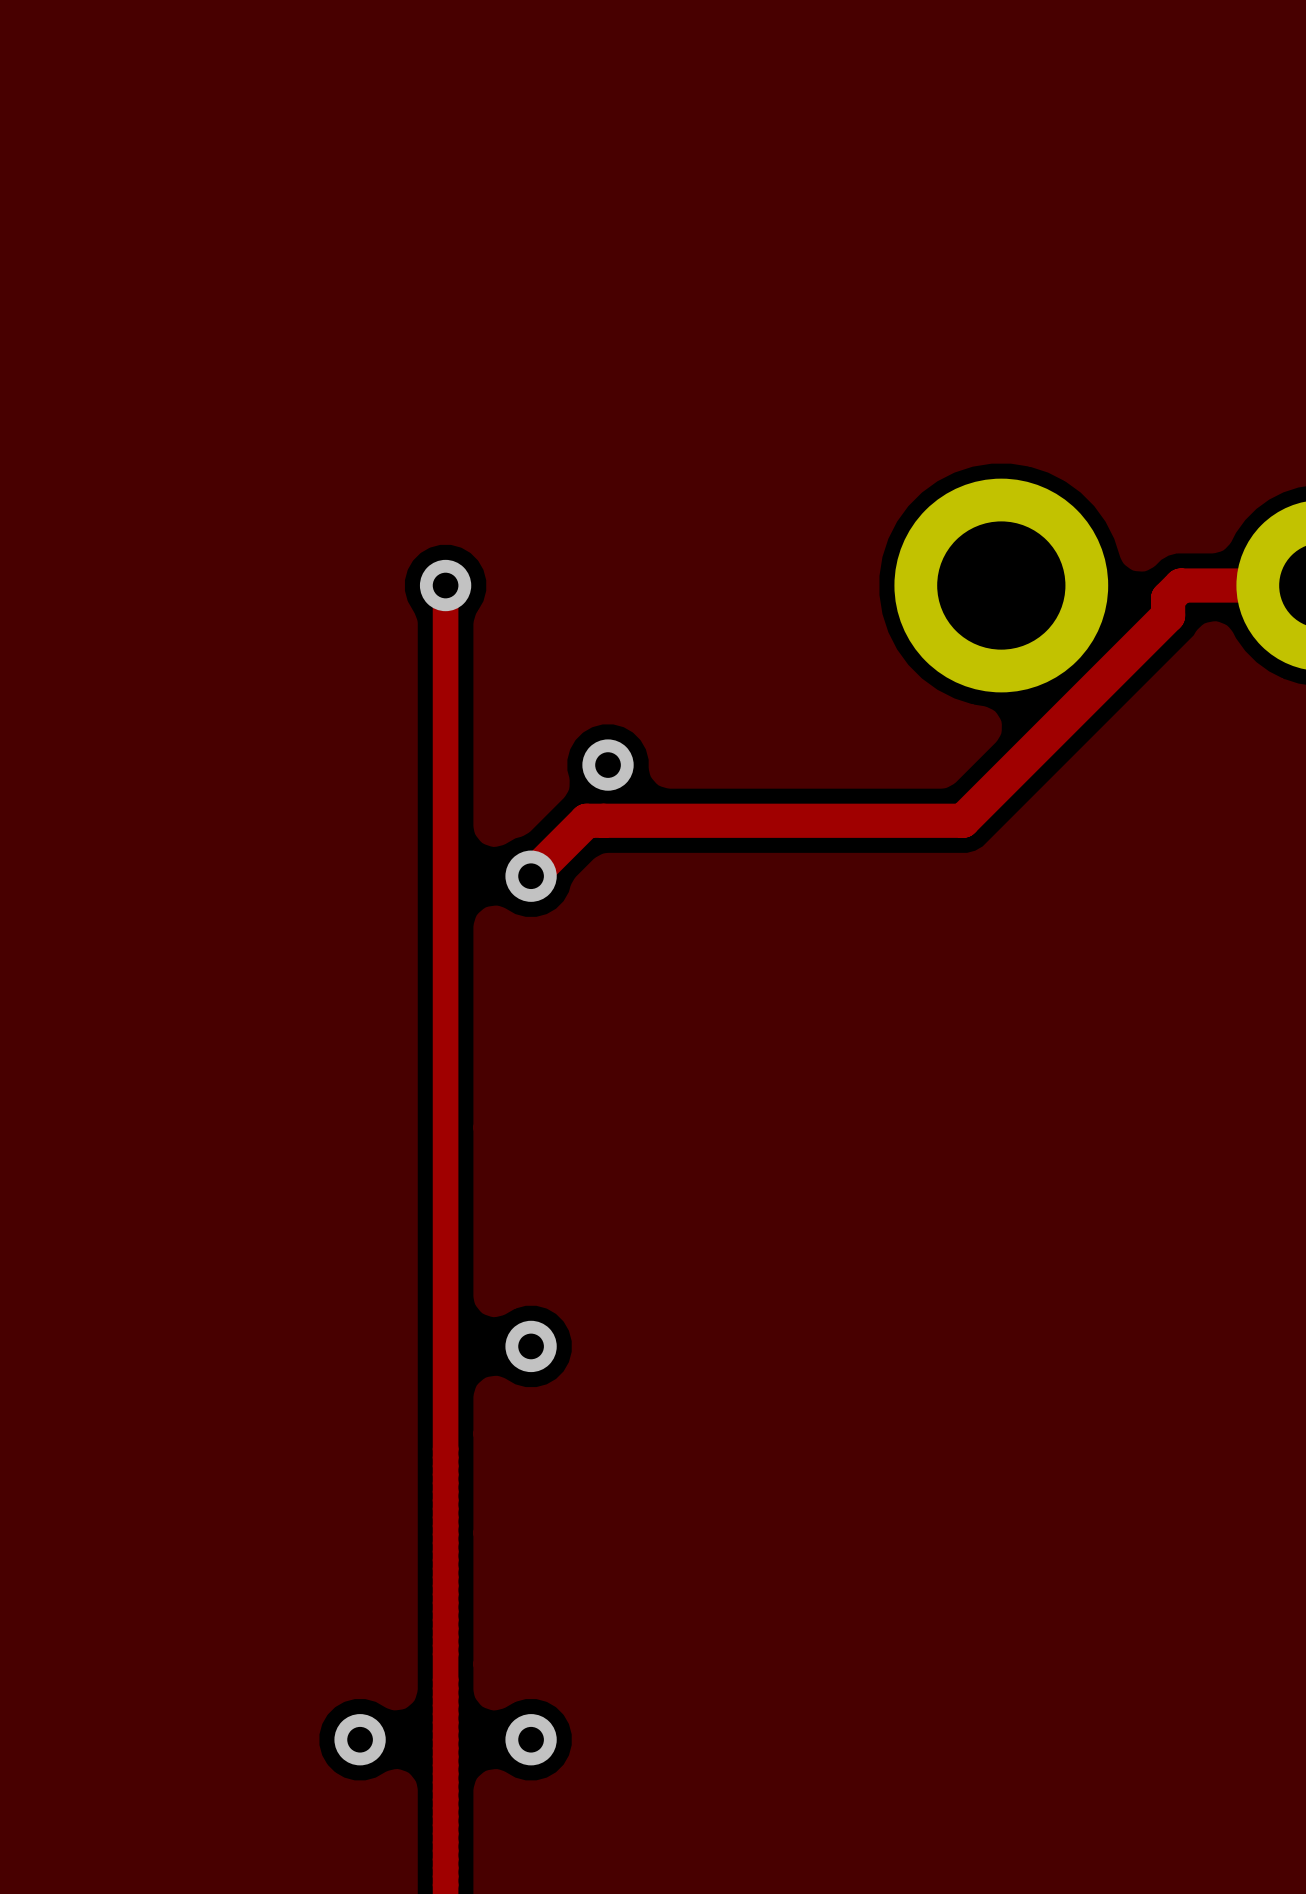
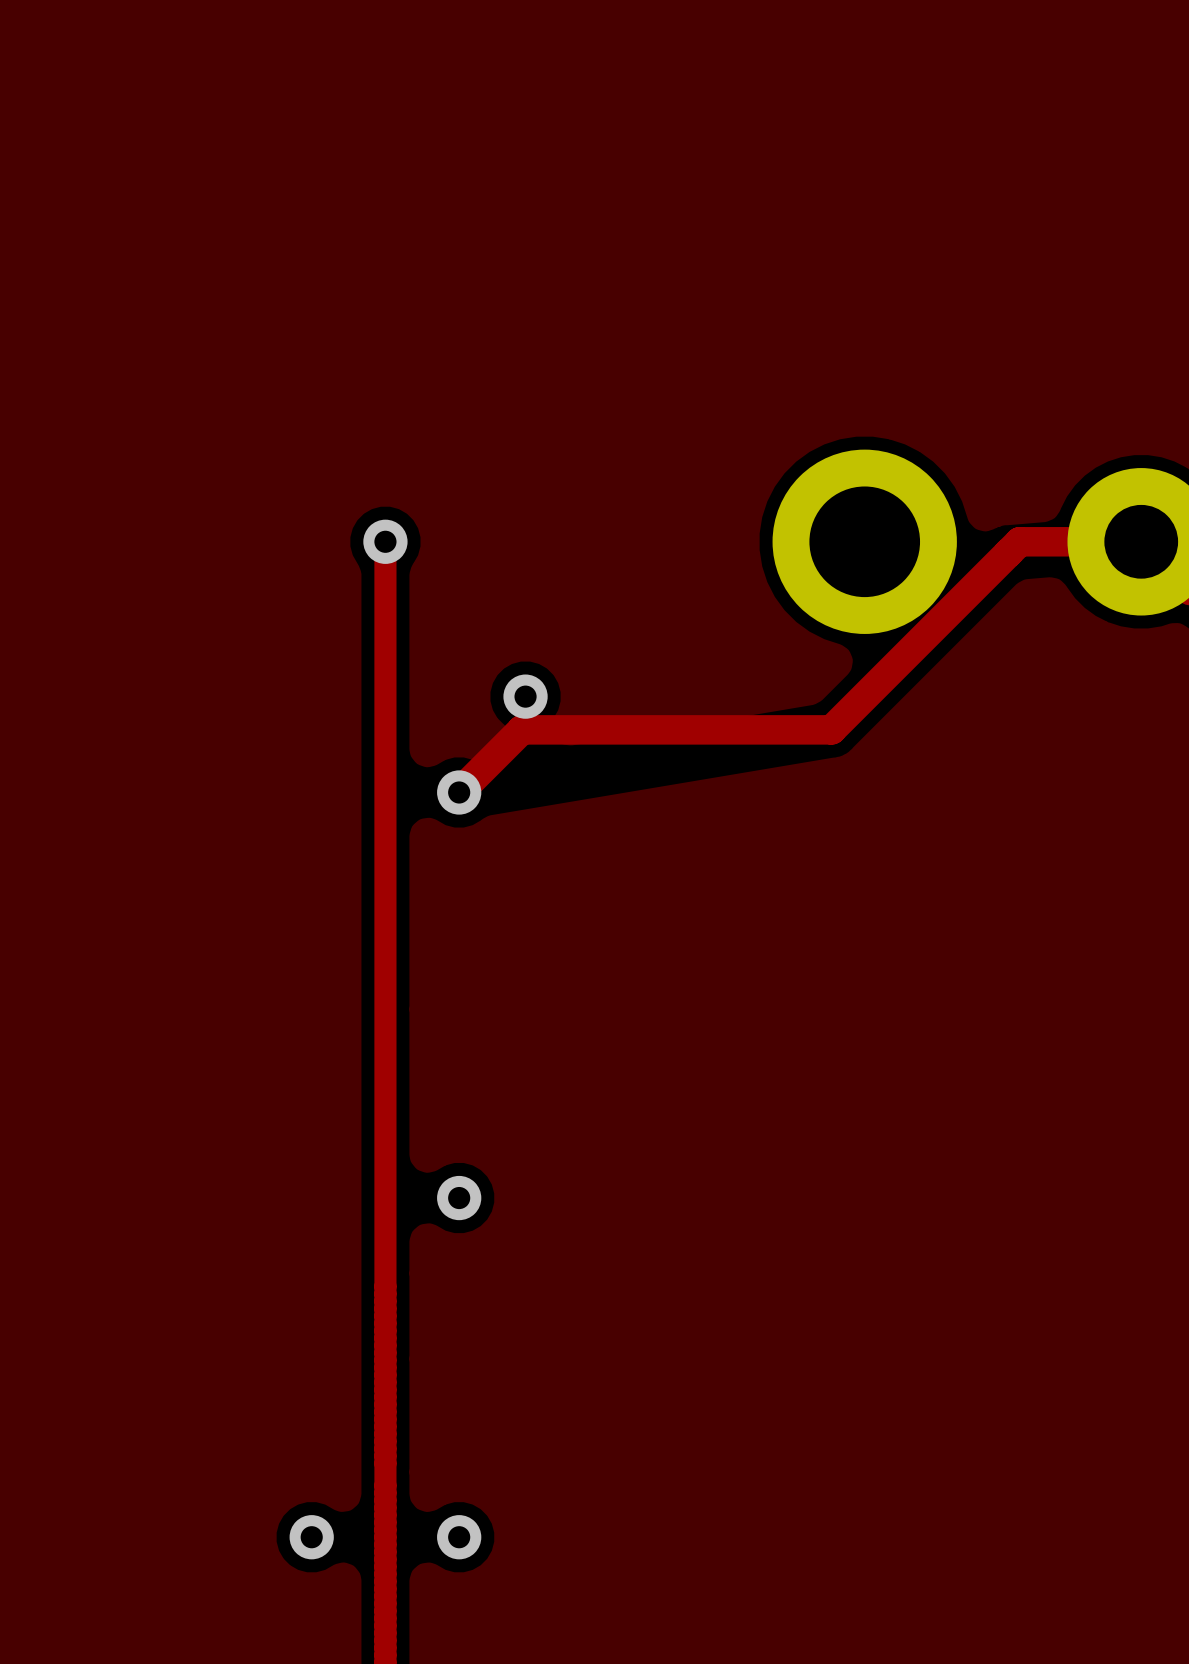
track: (1168, 598) (1168, 615) (962, 820) (586, 820) -> (1008, 552) (831, 729) (521, 729) (506, 744)

